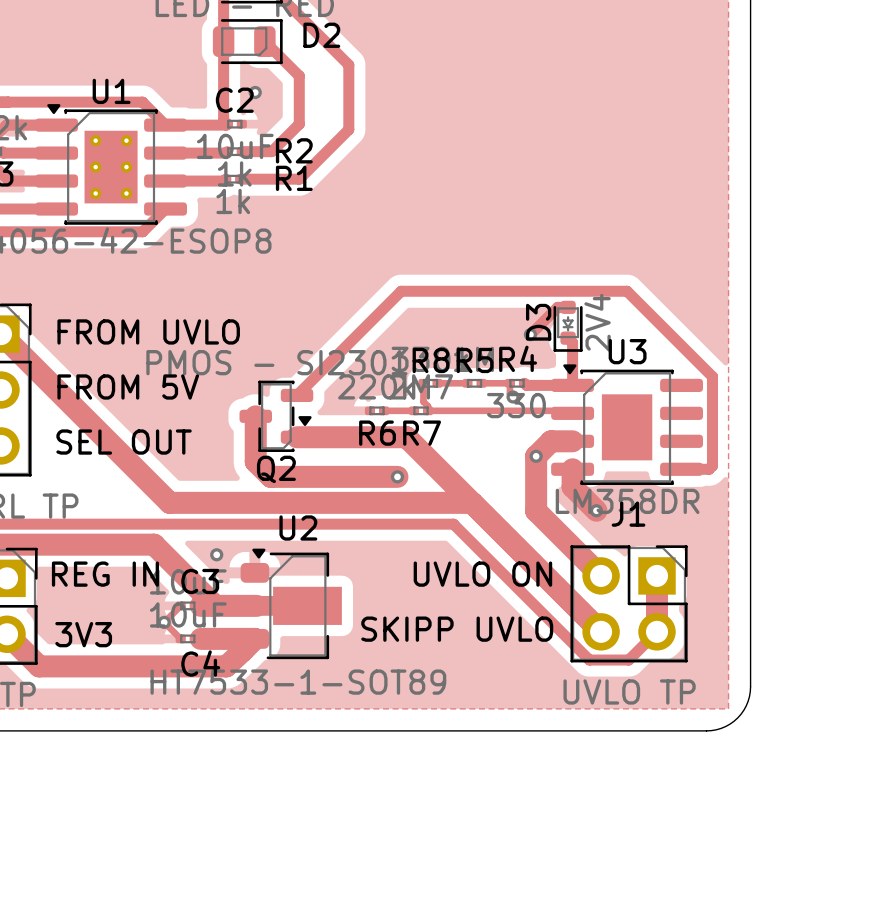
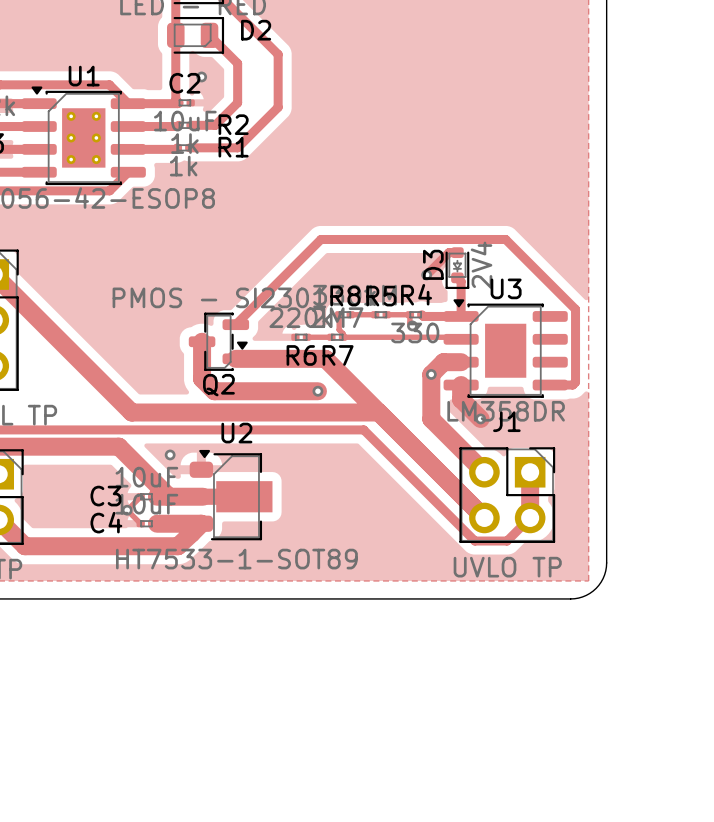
text: FROM UVLO (148, 331) -> none
text: FROM 5V (128, 386) -> none
text: SEL OUT (124, 442) -> none
text: REG IN (105, 574) -> none
text: UVLO ON (482, 574) -> none
C3 name position: C3 (200, 581) -> C3 (105, 496)
text: SKIPP UVLO (457, 629) -> none
text: 3V3 (83, 634) -> none
C4 name position: C4 (200, 663) -> C4 (106, 522)

